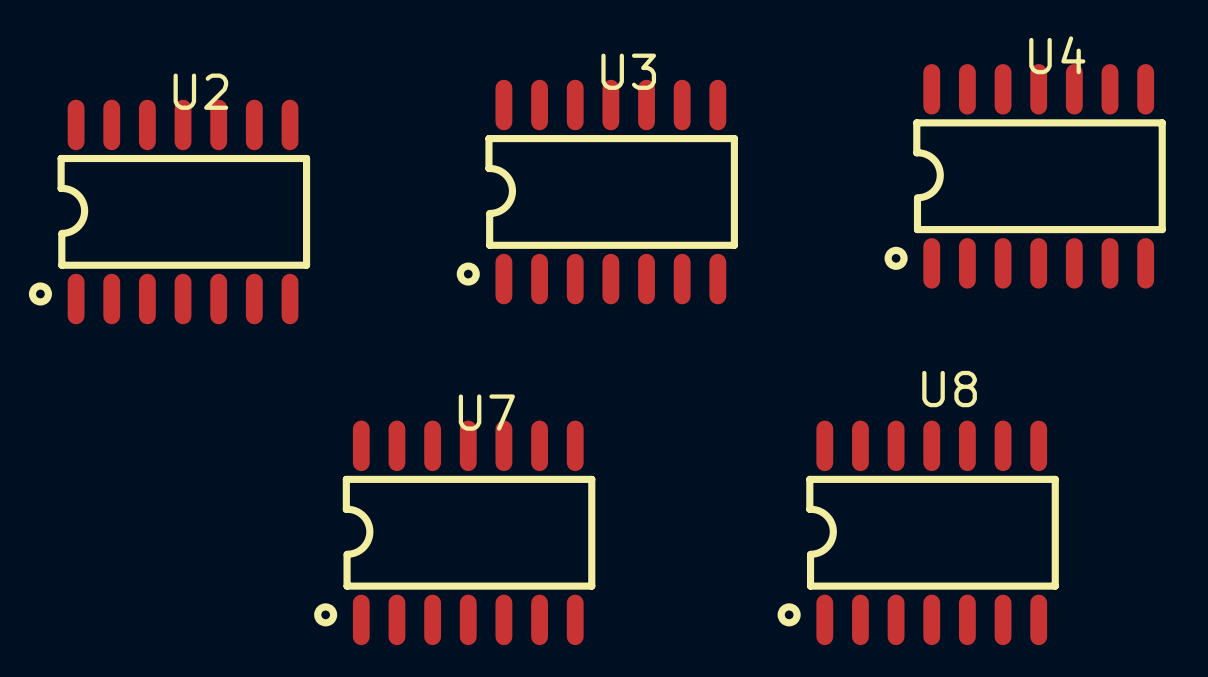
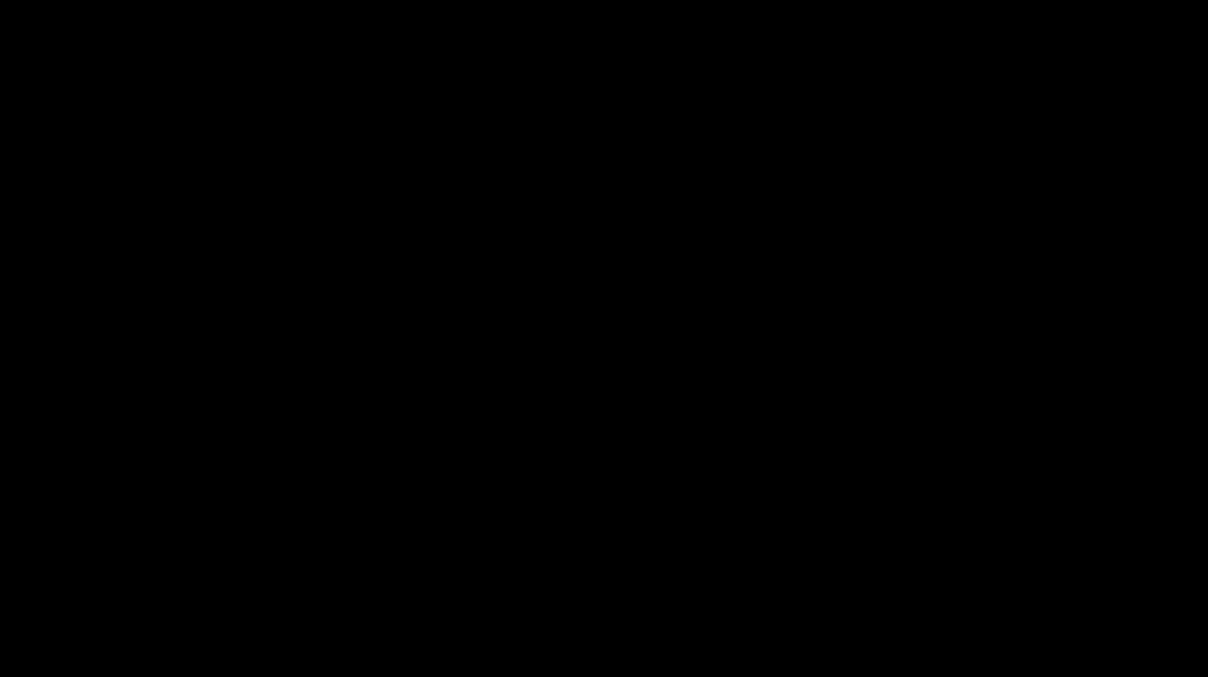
U4: (1025, 176) -> none
U3: (597, 192) -> none
U2: (169, 211) -> none
U7: (454, 532) -> none
U8: (918, 532) -> none

